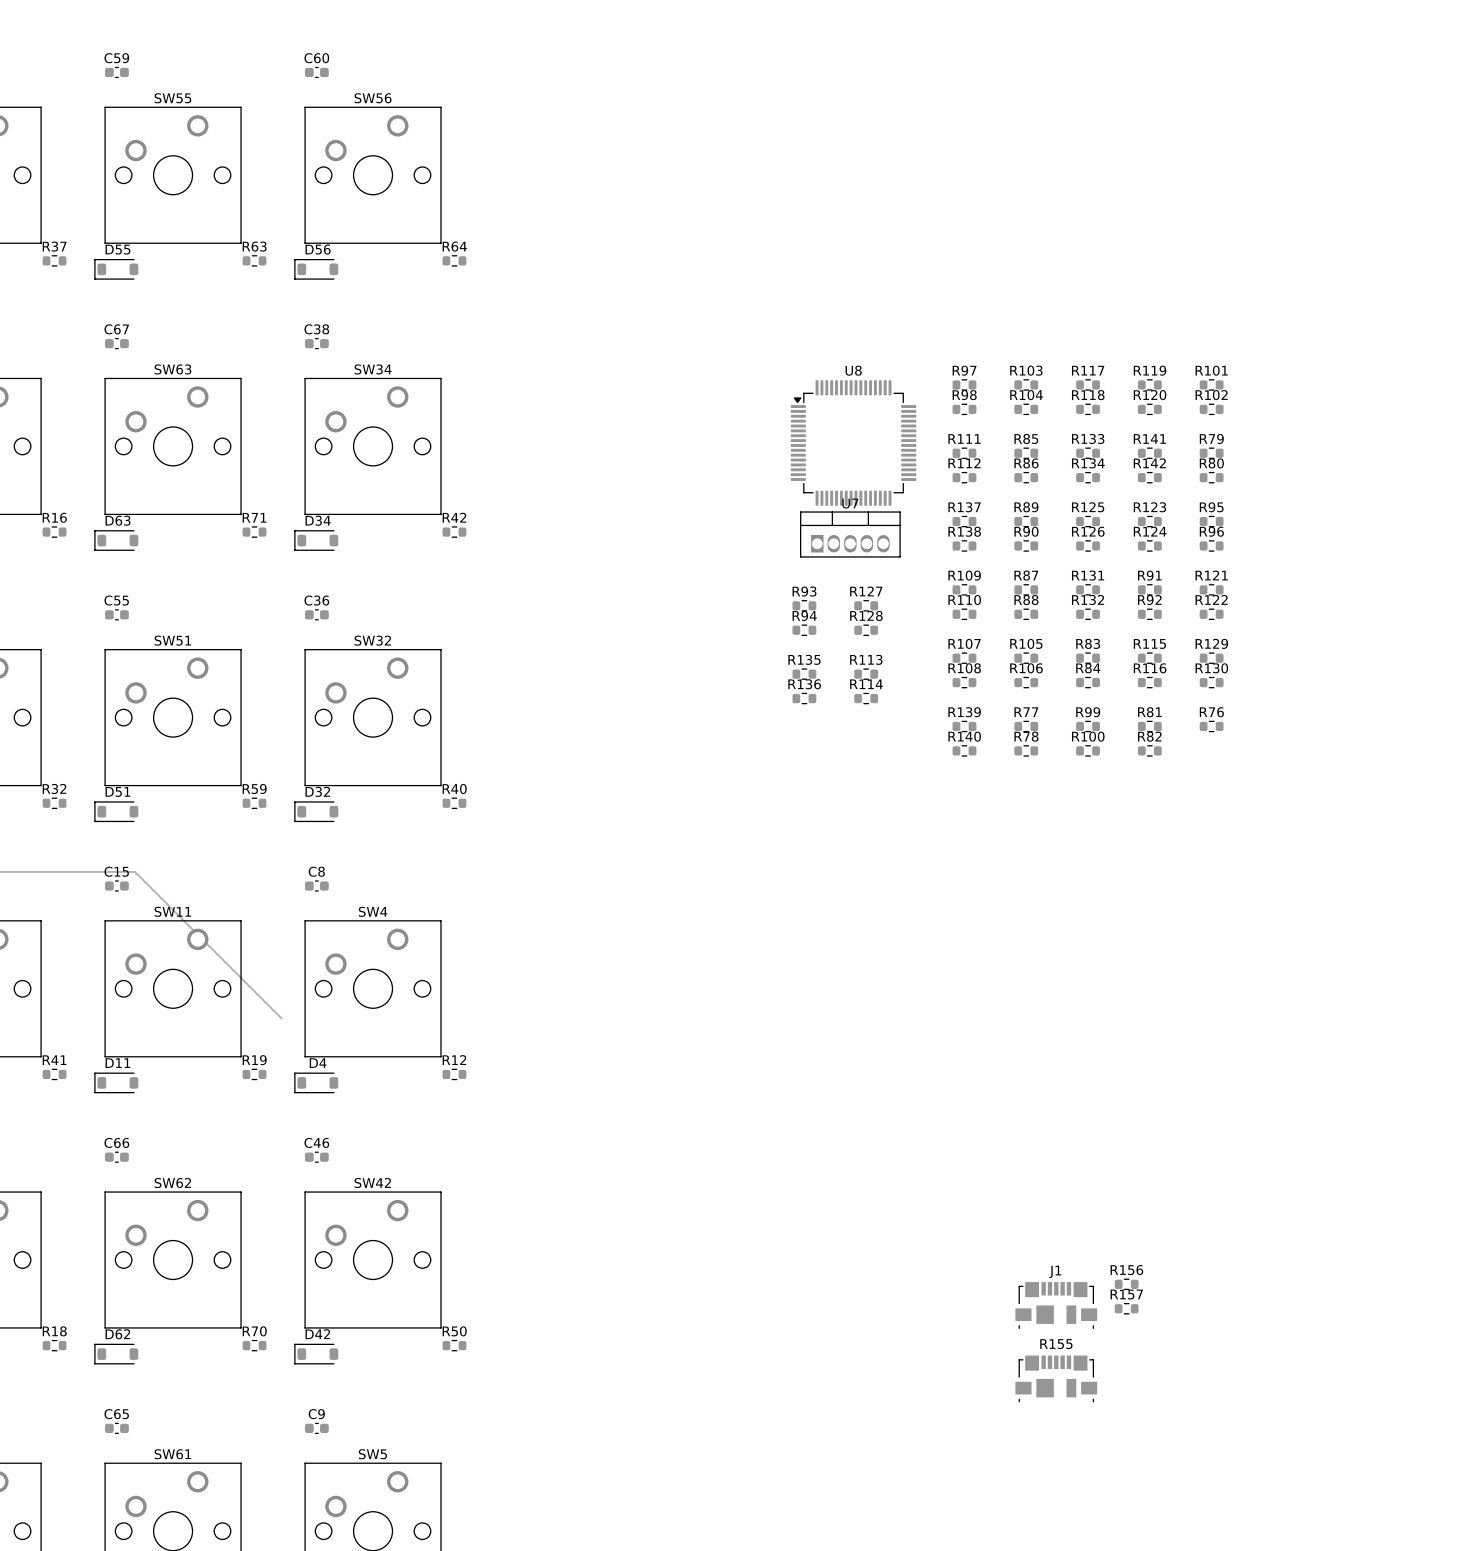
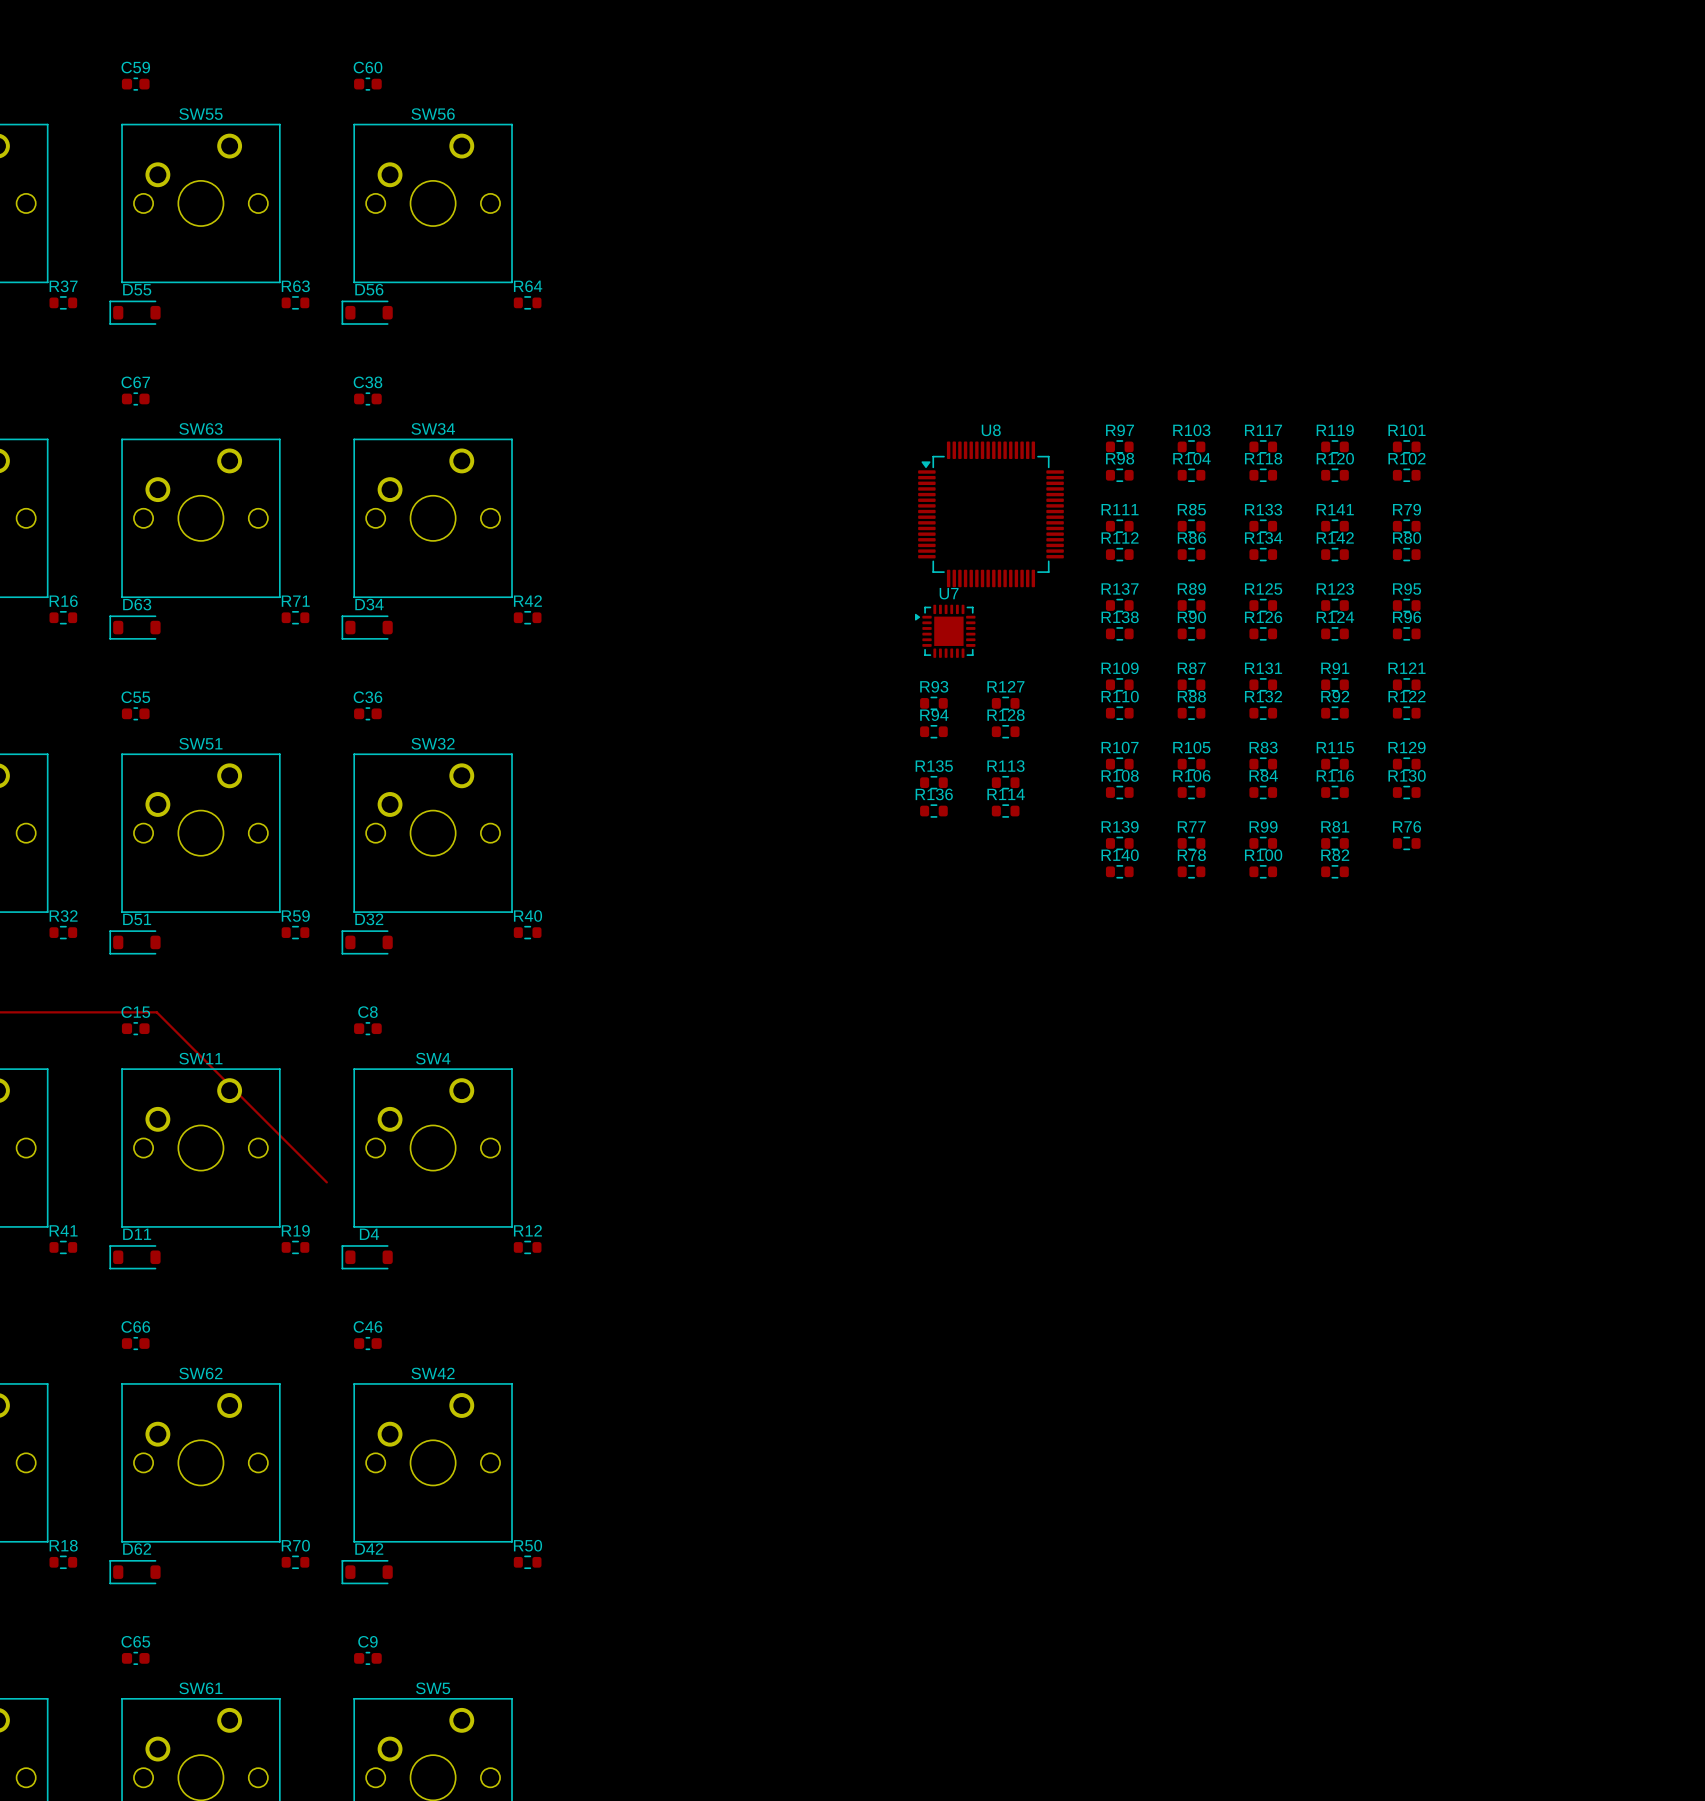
U7 footprint: [800, 511, 901, 558] -> [915, 604, 976, 658]
R156: (1126, 1284) -> none
J1: (1056, 1305) -> none
R157: (1126, 1308) -> none
R155: (1056, 1378) -> none

